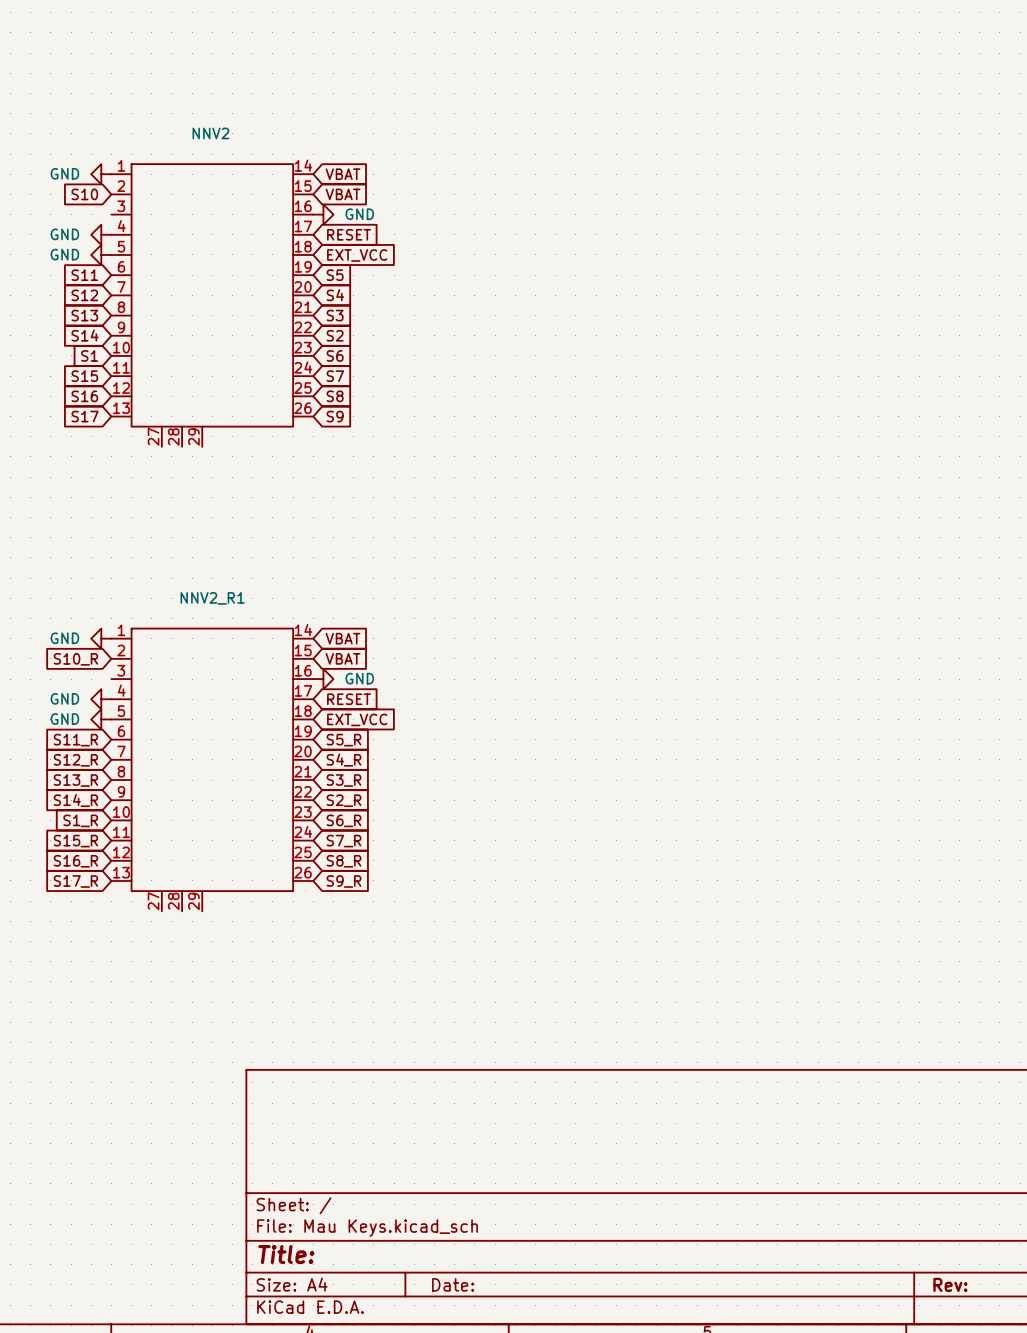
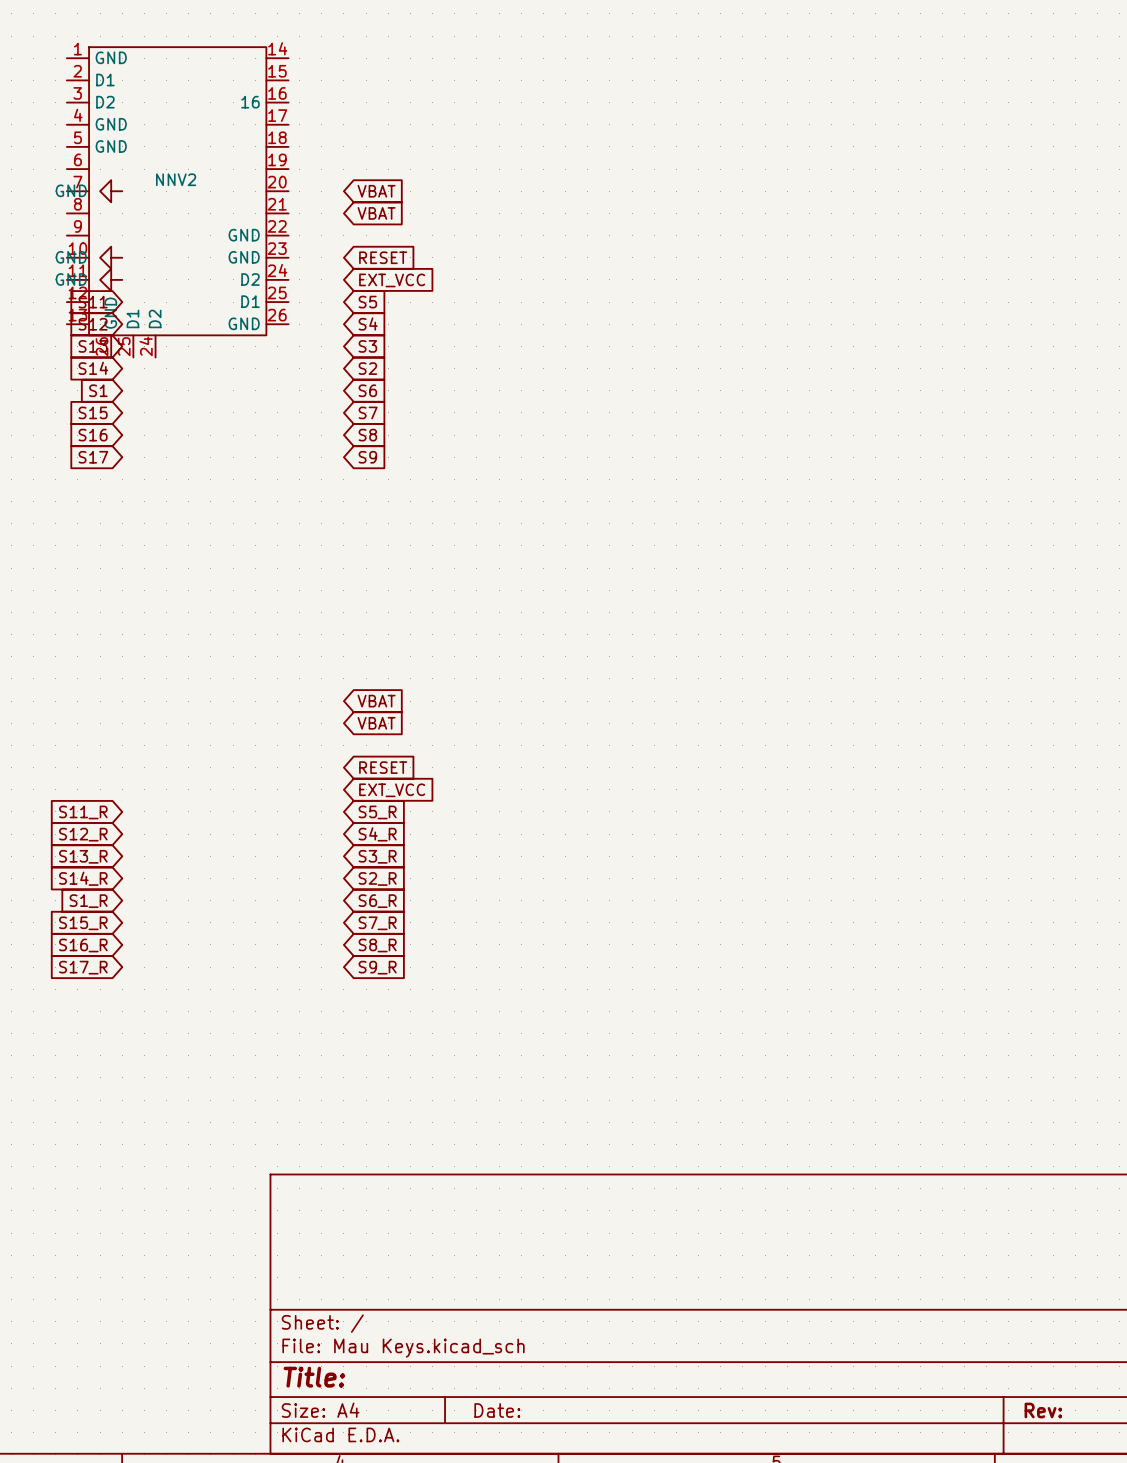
NNV2 name position: NNV2 (210, 133) -> NNV2 (176, 179)
NNV2 symbol: [111, 164, 314, 447] -> [66, 47, 289, 358]
global label: S10 (84, 194) -> none
power symbol: GND (323, 214) -> none
power symbol: GND (101, 638) -> none
global label: S10_R (75, 659) -> none
power symbol: GND (323, 679) -> none
power symbol: GND (101, 699) -> none
power symbol: GND (101, 719) -> none
NNV2_R1: (212, 769) -> none

